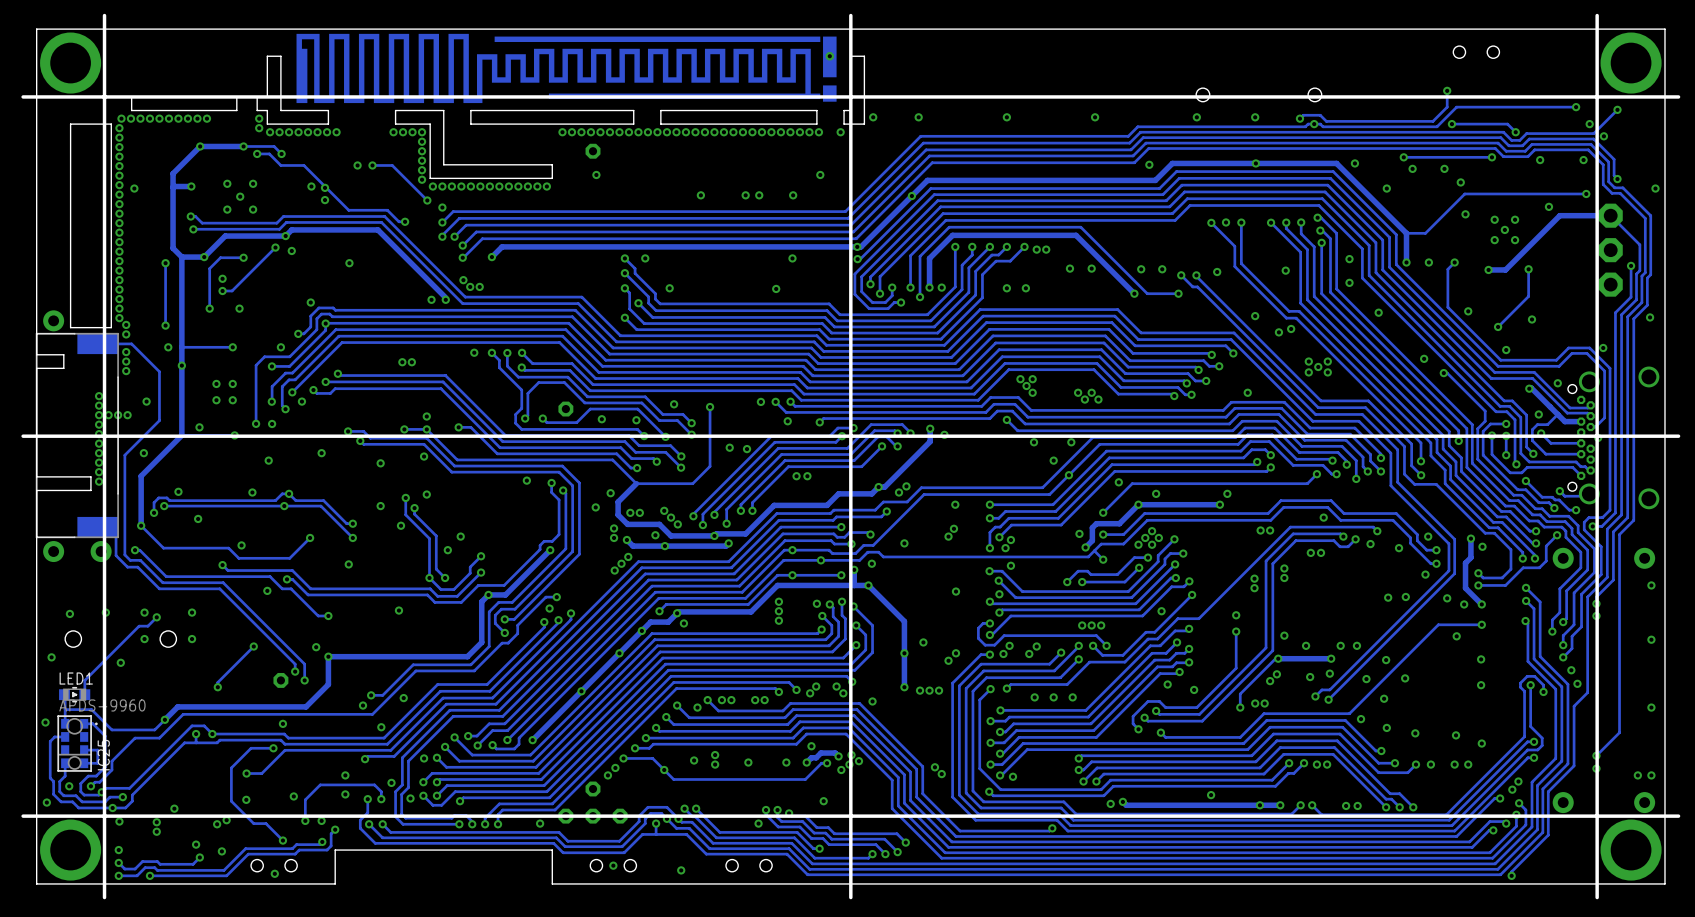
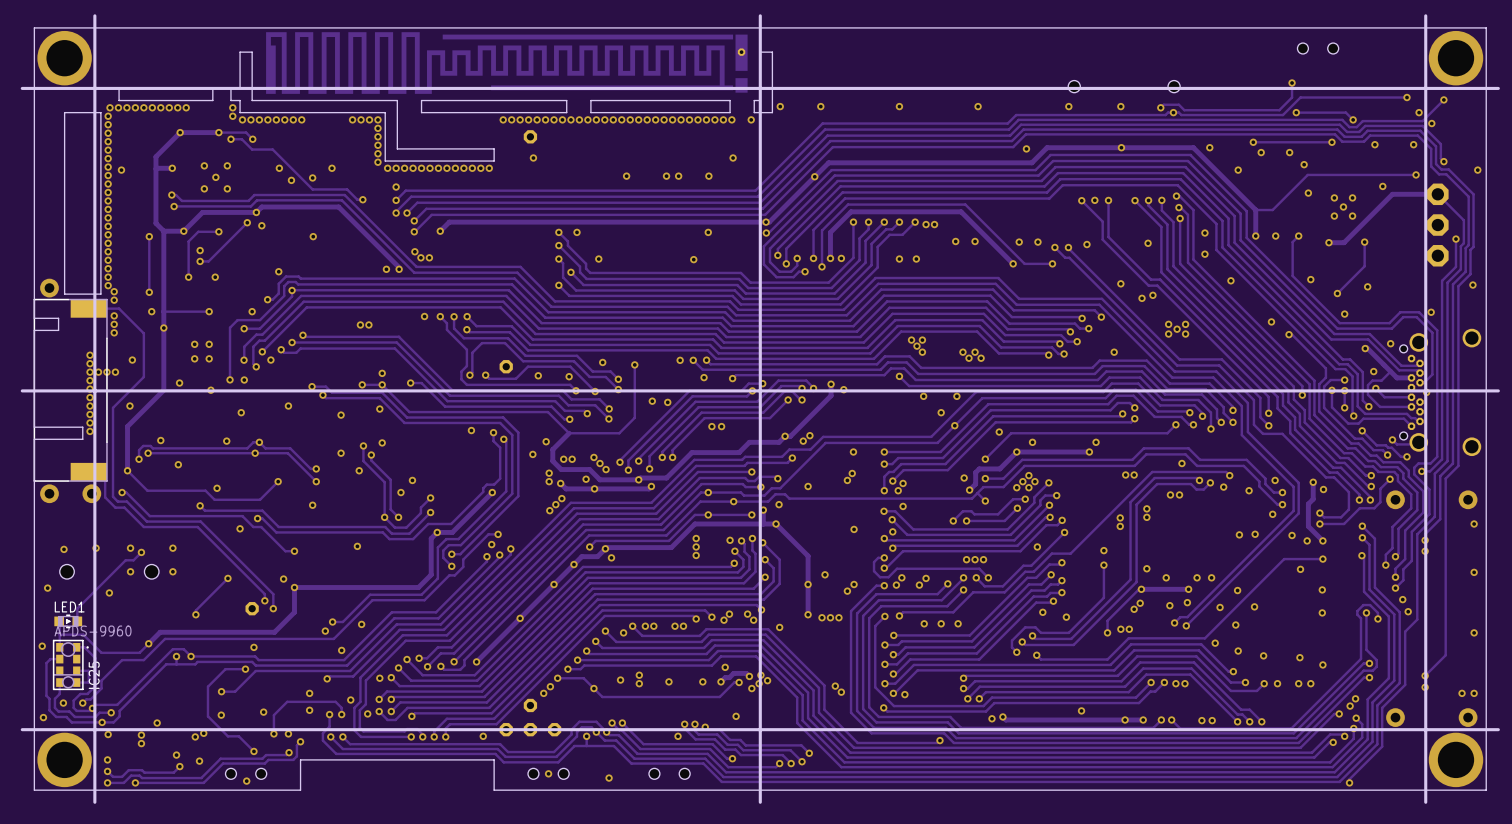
board edge: (328, 110) (328, 124) -> (354, 112) (294, 112)
board edge: (395, 110) (395, 124) -> (354, 100) (294, 100)
via: (357, 165) -> none
track: (372, 165) (392, 165) (427, 200) -> none
via: (372, 165) -> none
via: none -> (332, 168)
via: (325, 187) -> none
via: none -> (312, 177)
via: (427, 200) -> none

